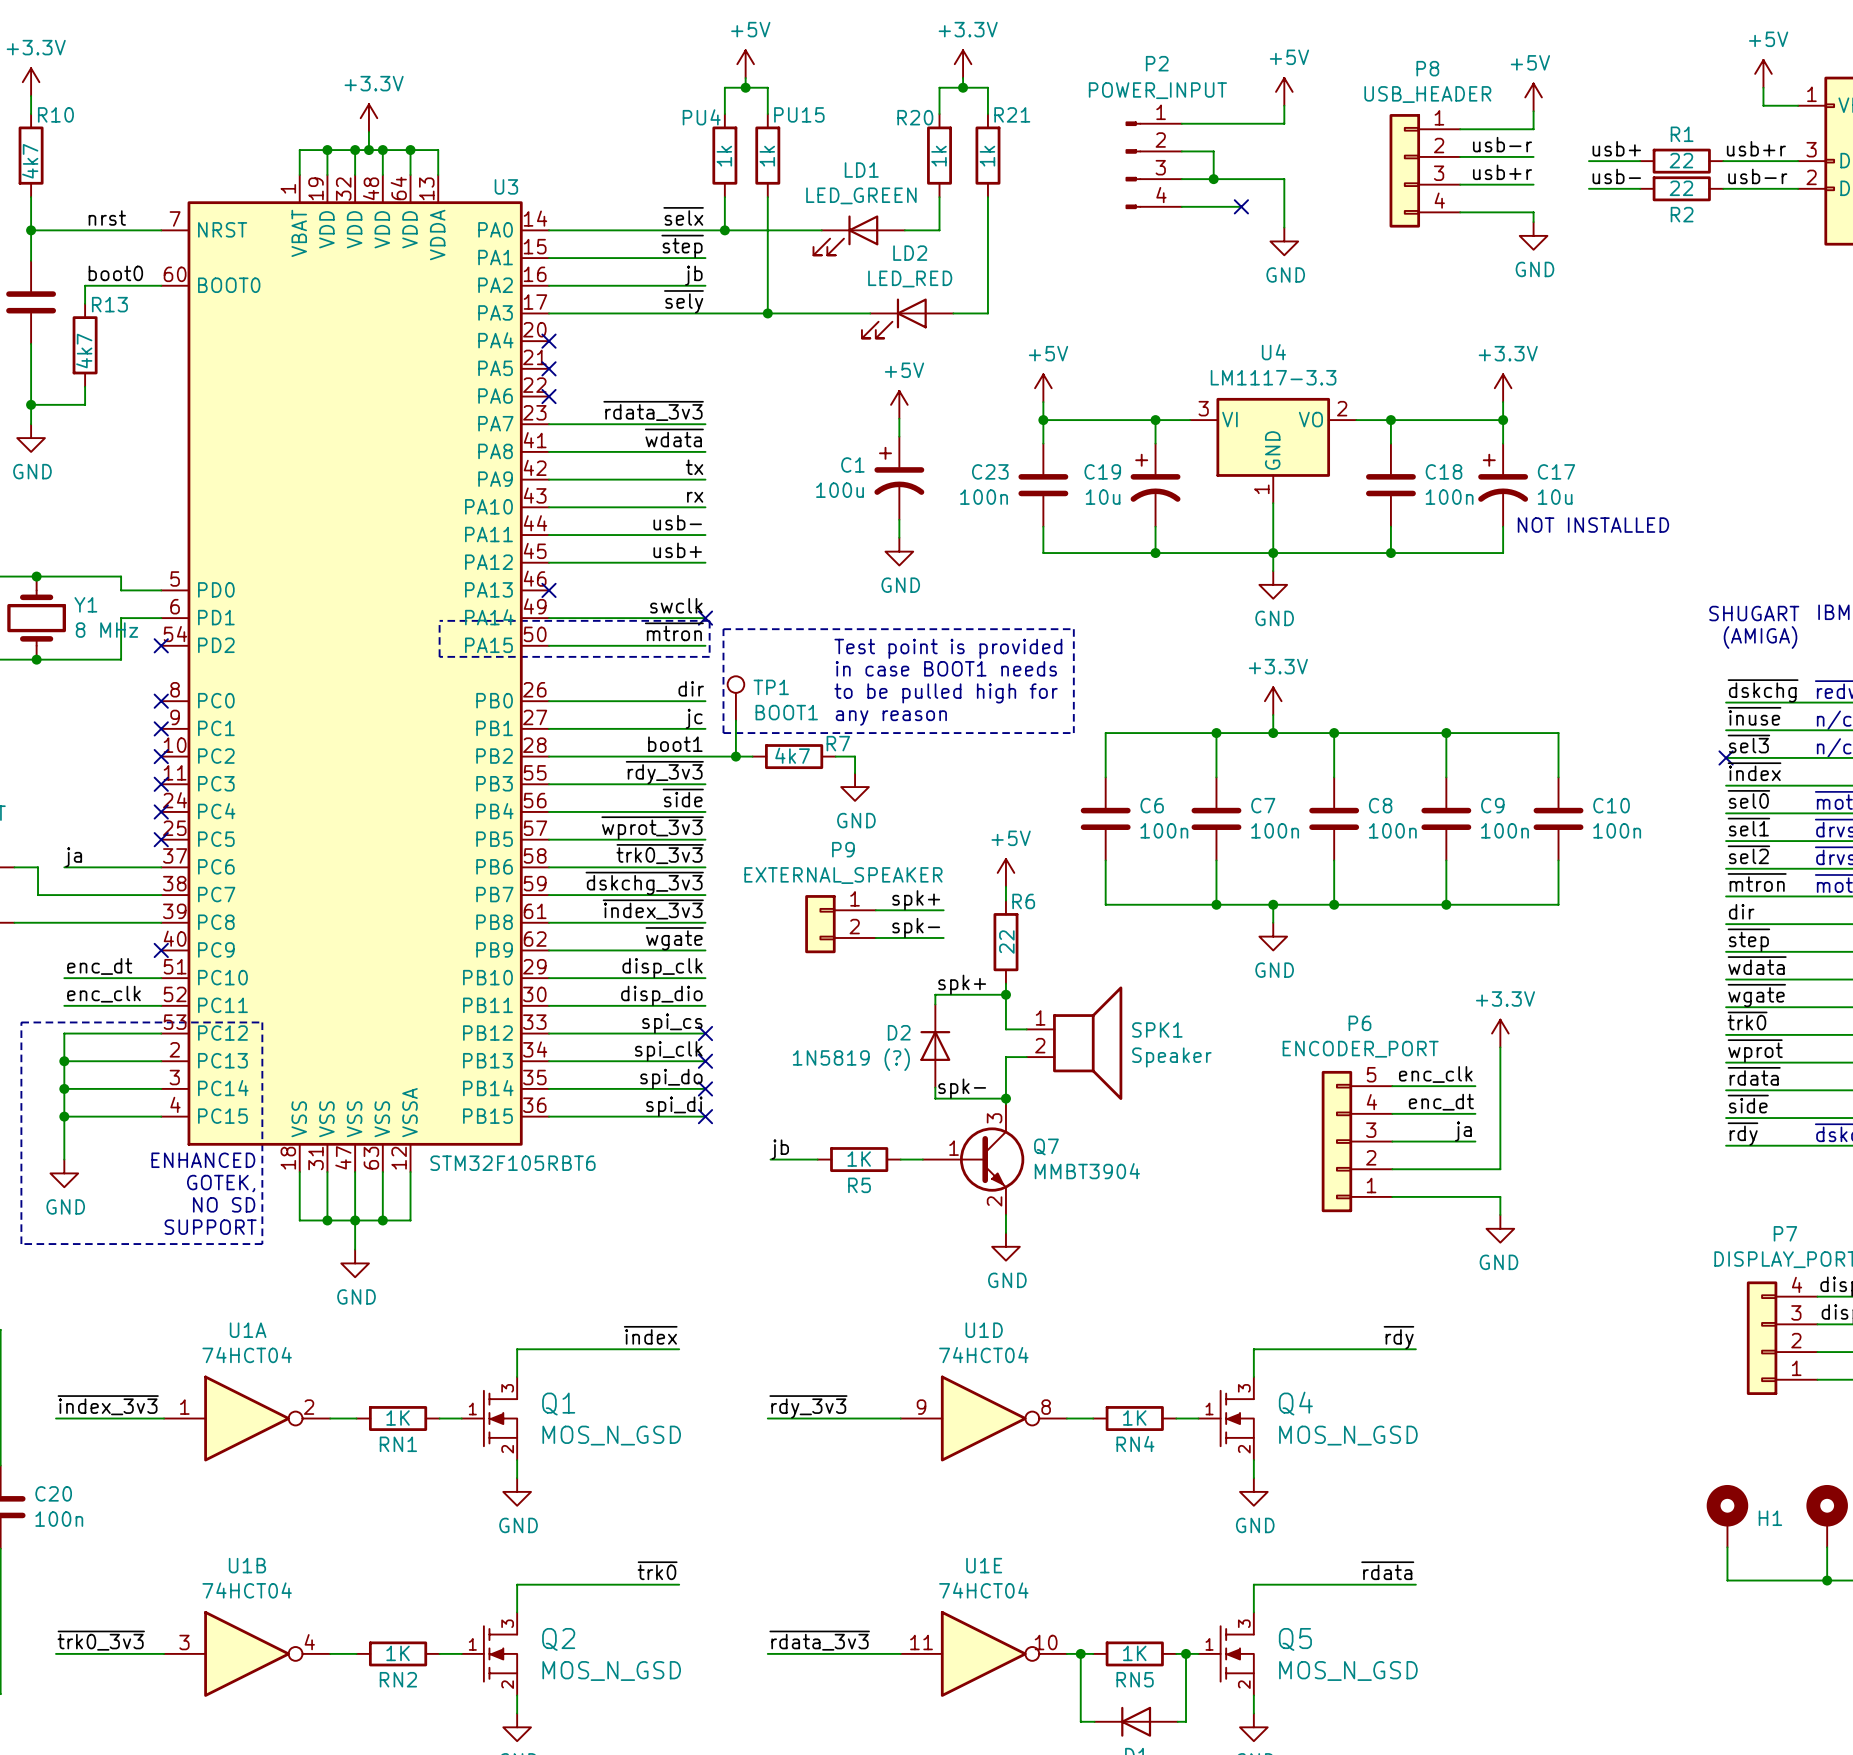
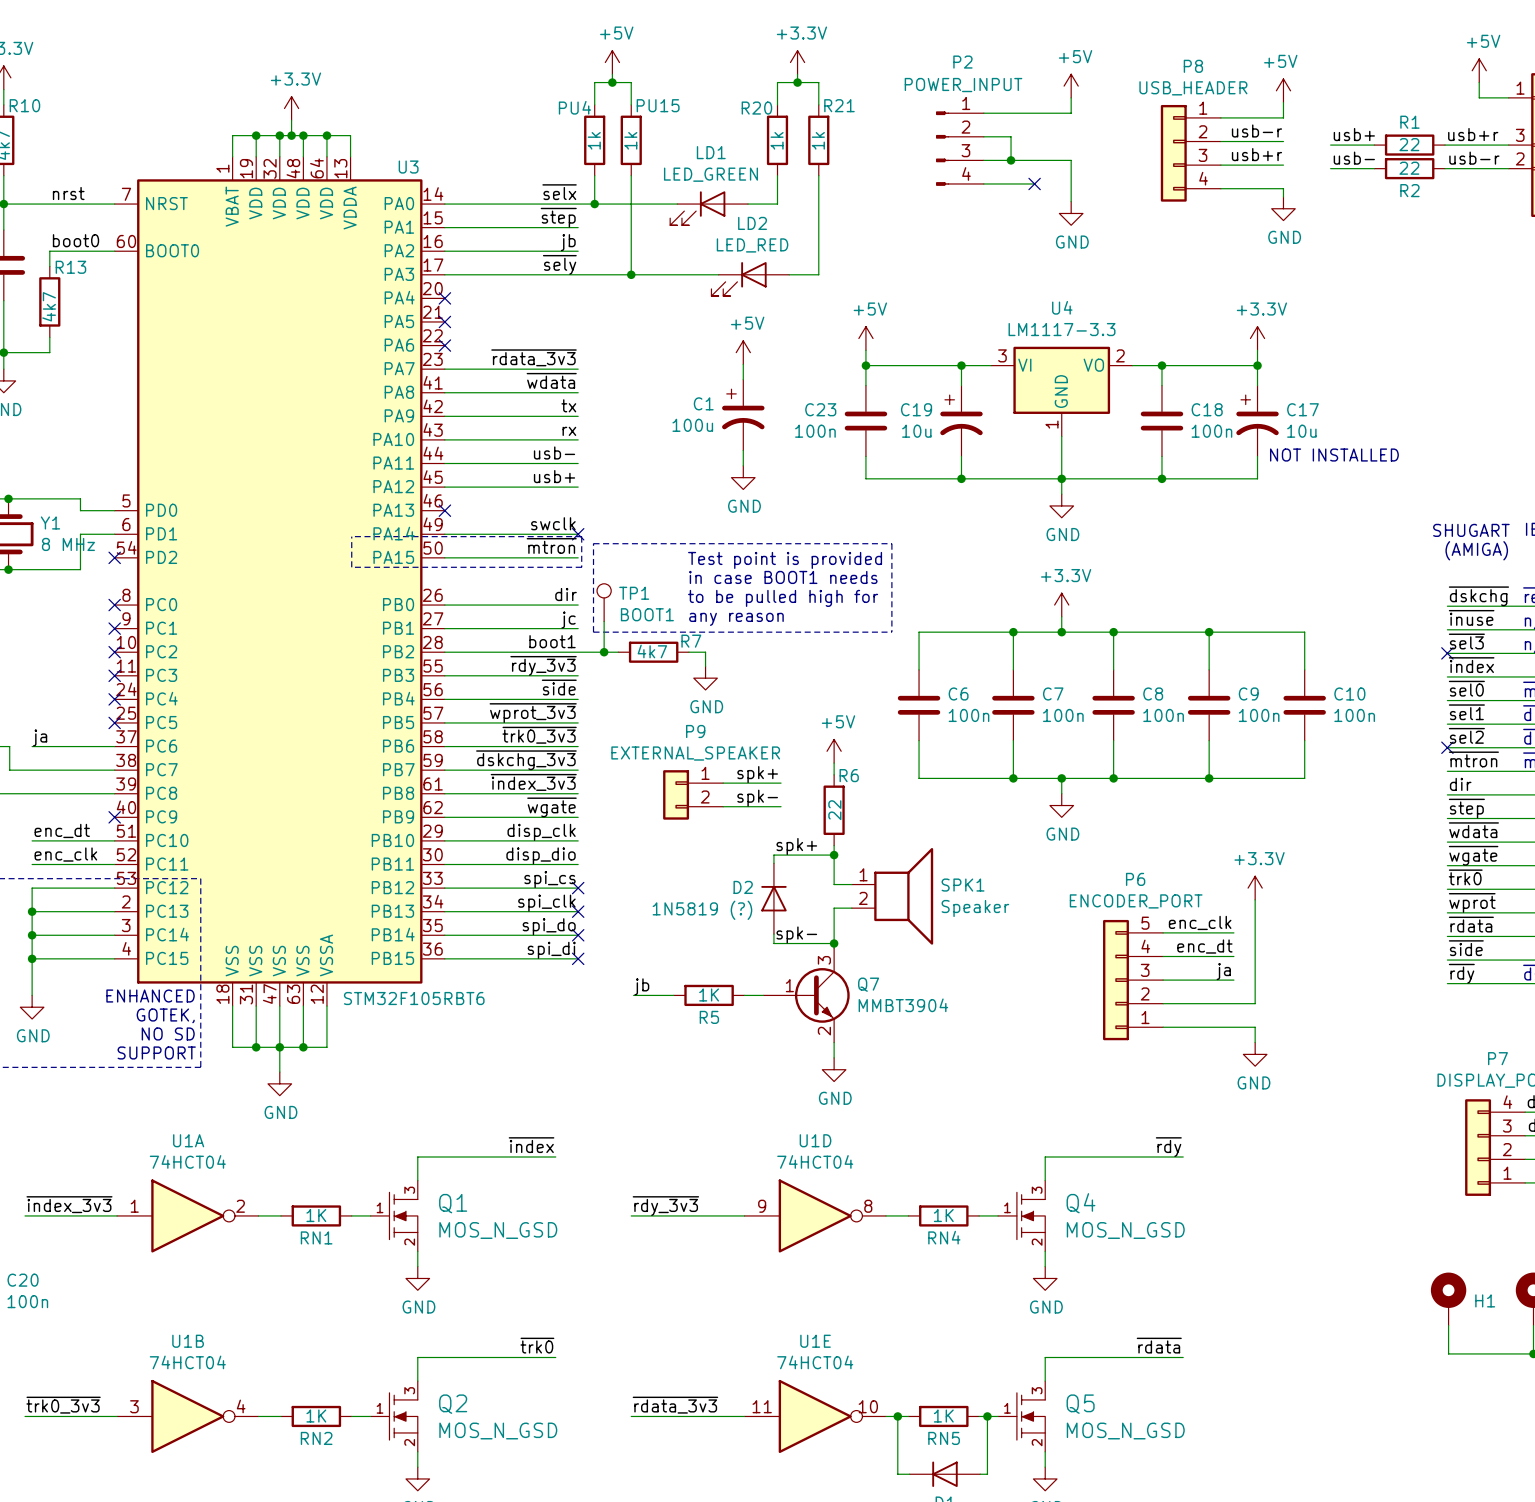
no-connect mark: none -> (1447, 747)

